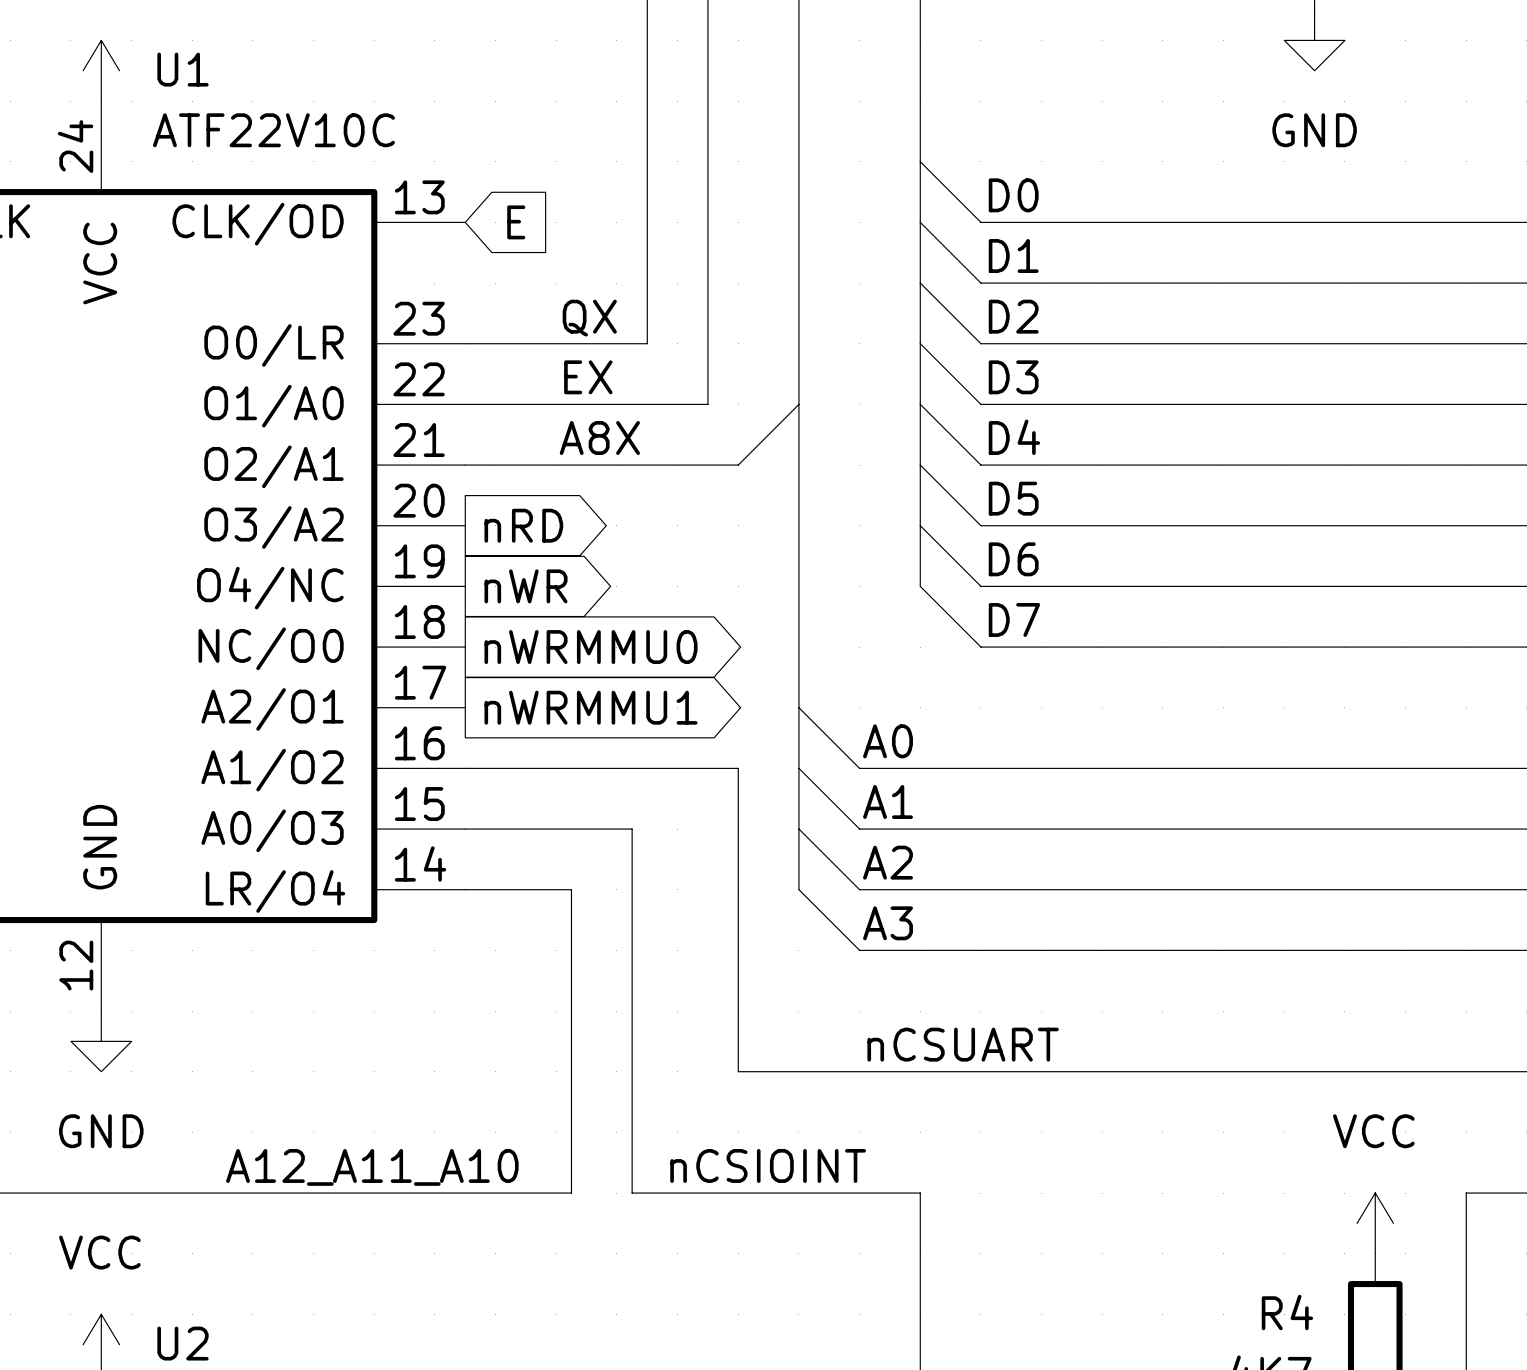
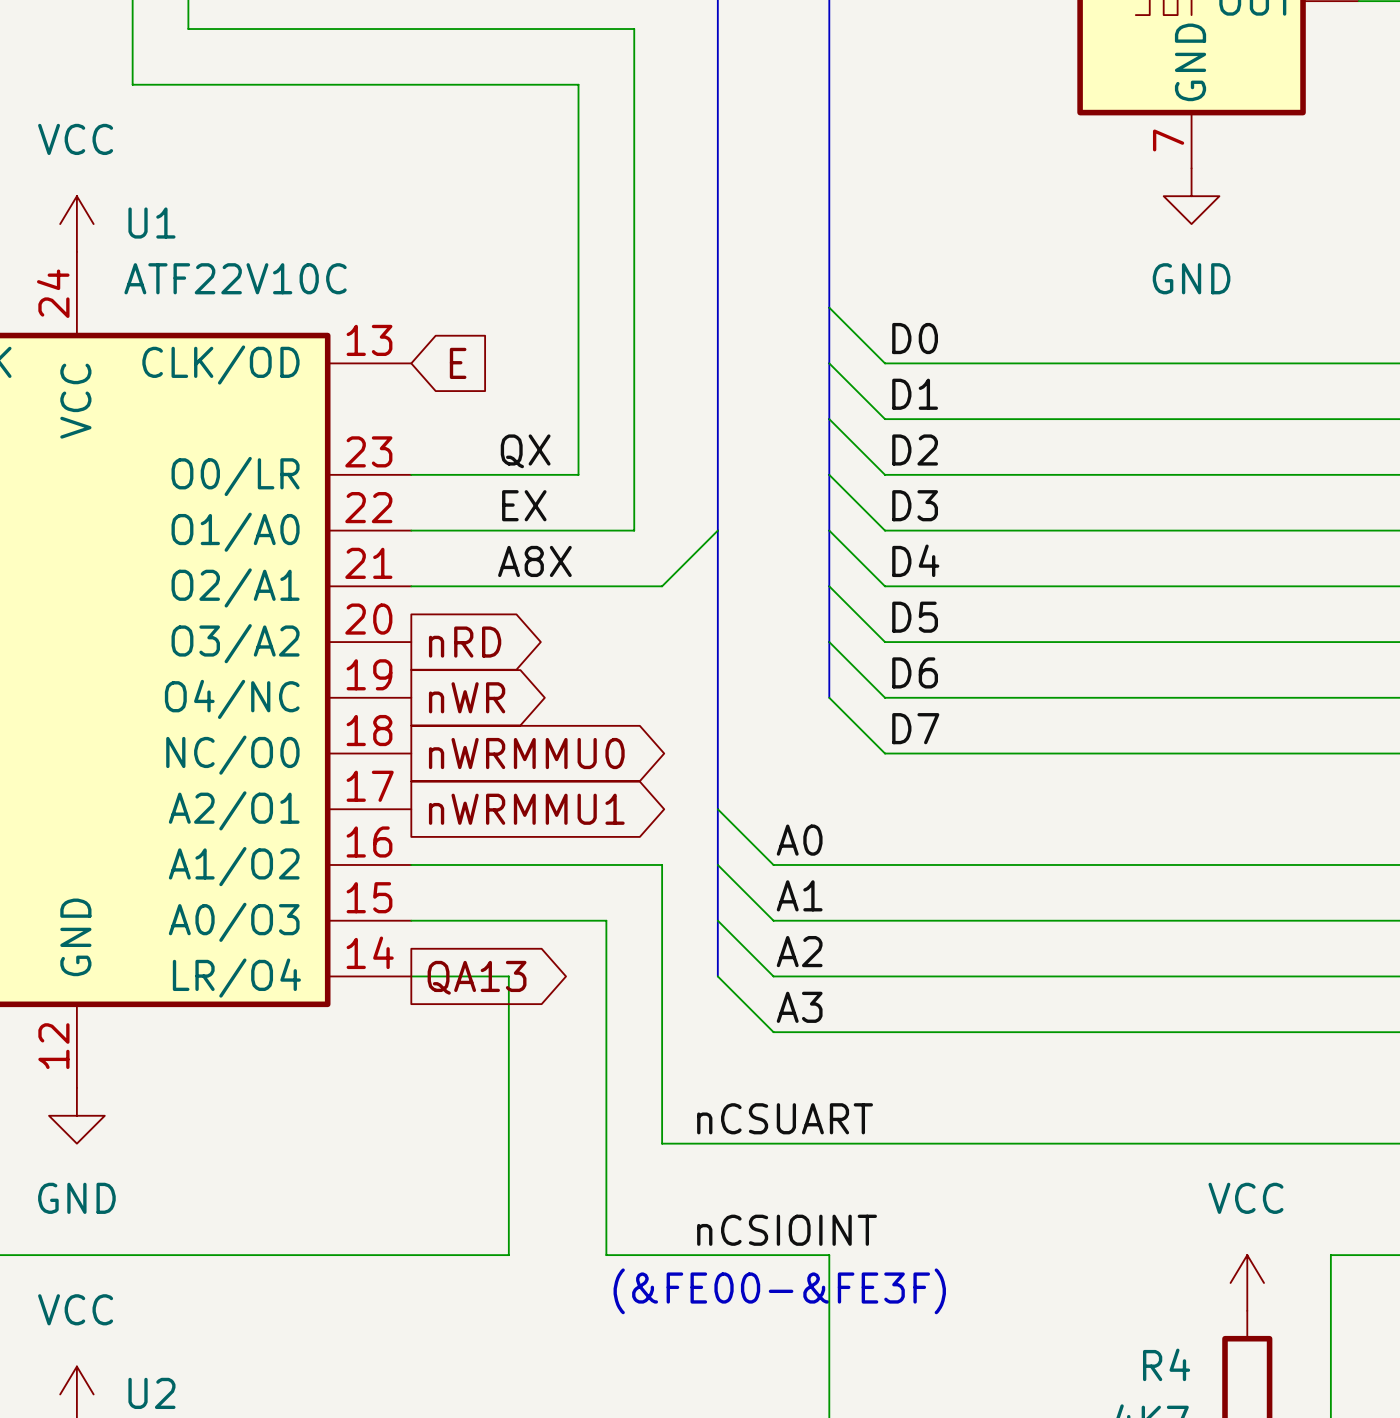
wire: (632, 829) (632, 1193) (677, 1193) -> (564, 920) (606, 920) (606, 1255)
global label: none -> QA13 (477, 977)
label position: nCSUART (963, 1044) -> nCSUART (785, 1118)
label position: nCSIOINT (768, 1165) -> nCSIOINT (787, 1230)
label: A12_A11_A10 (372, 1167) -> none
text: none -> (&FE00-&FE3F) (779, 1291)

